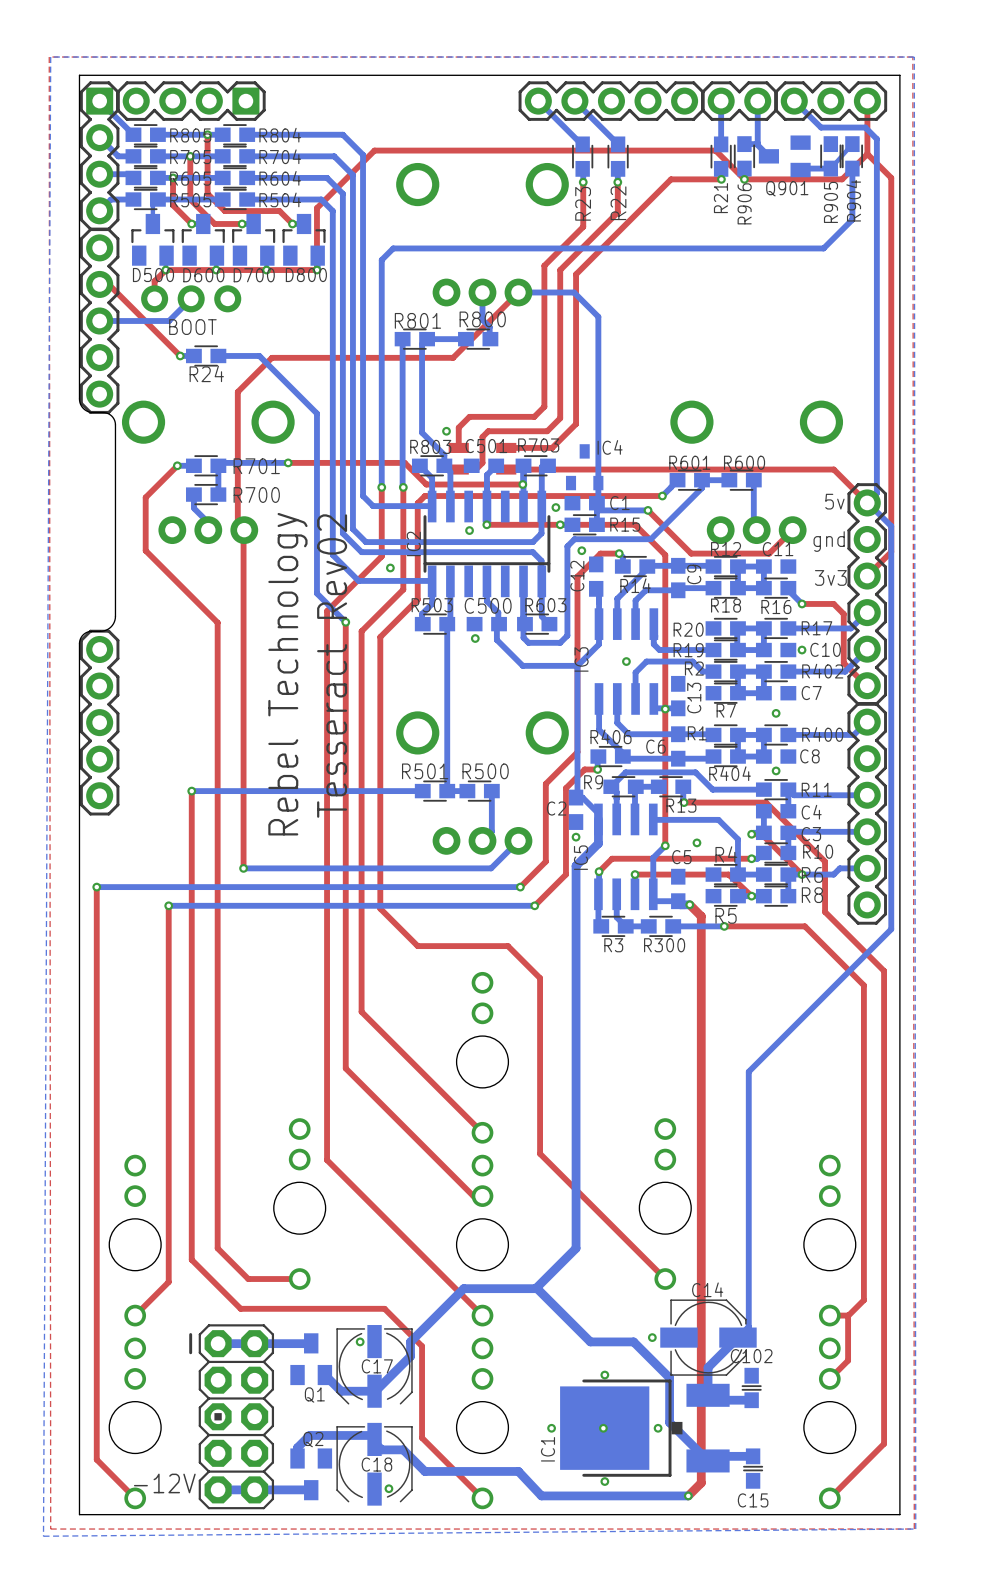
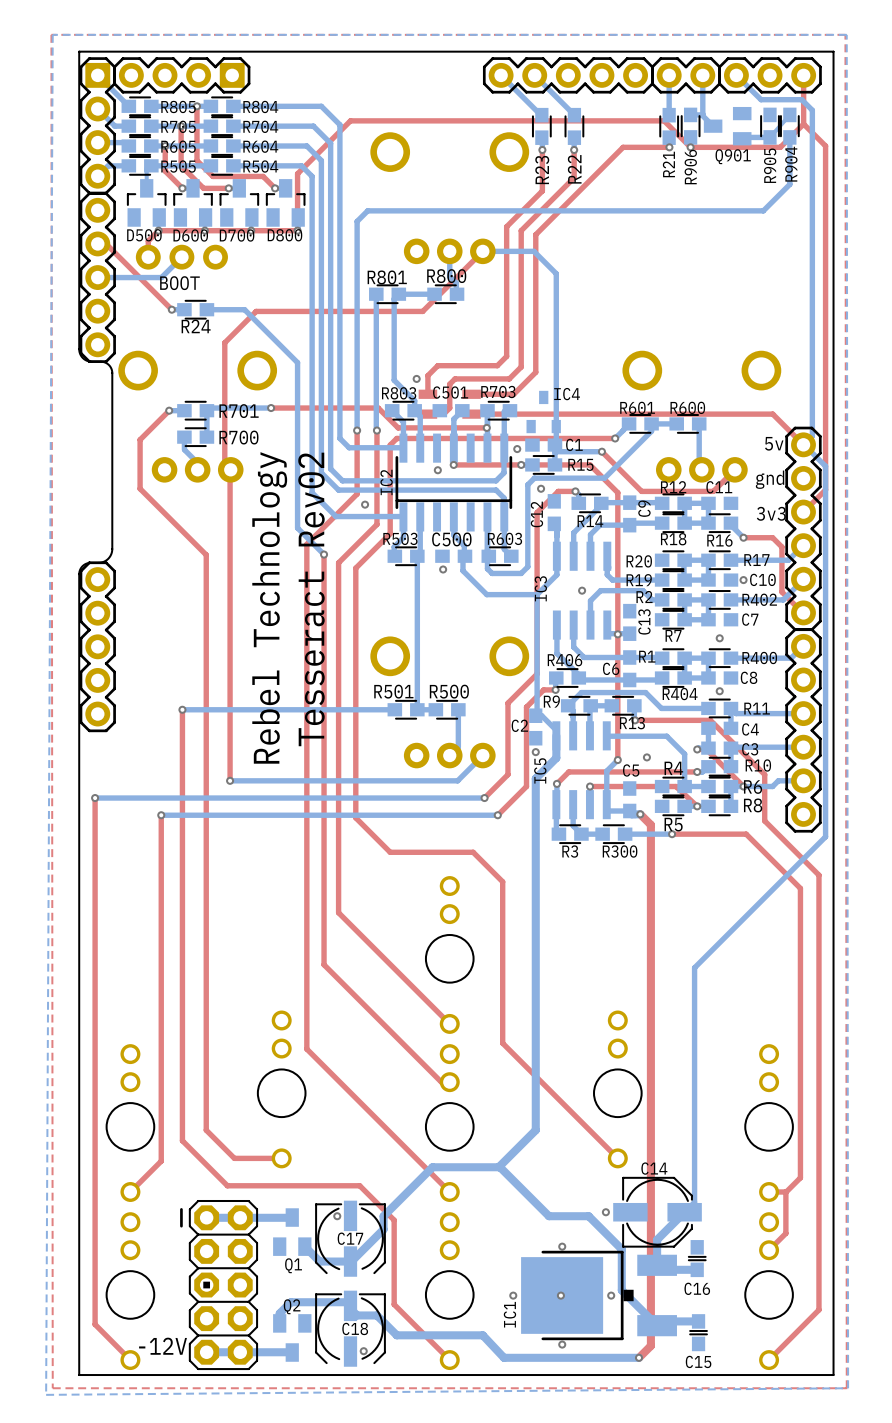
C102 name: C102 (751, 1356) -> C16 (697, 1288)

